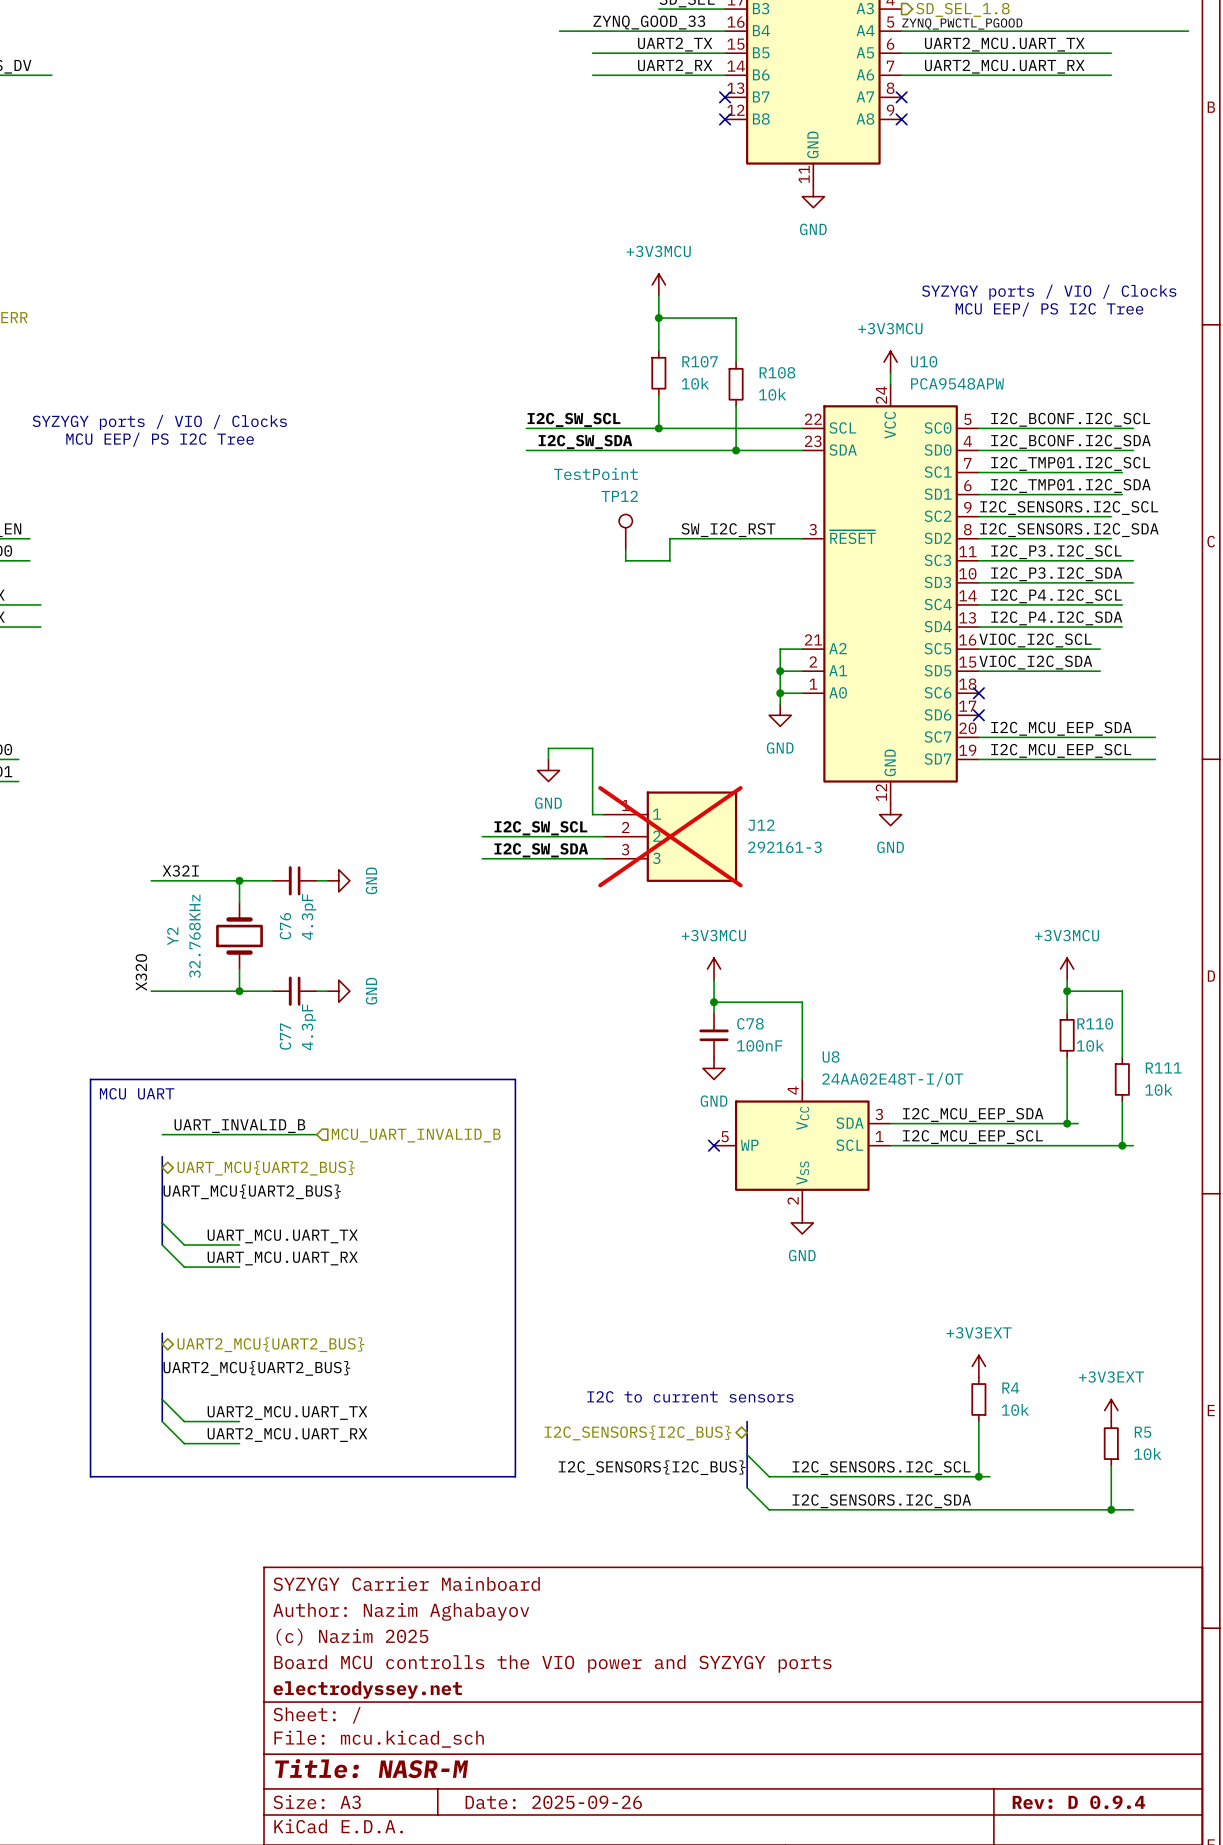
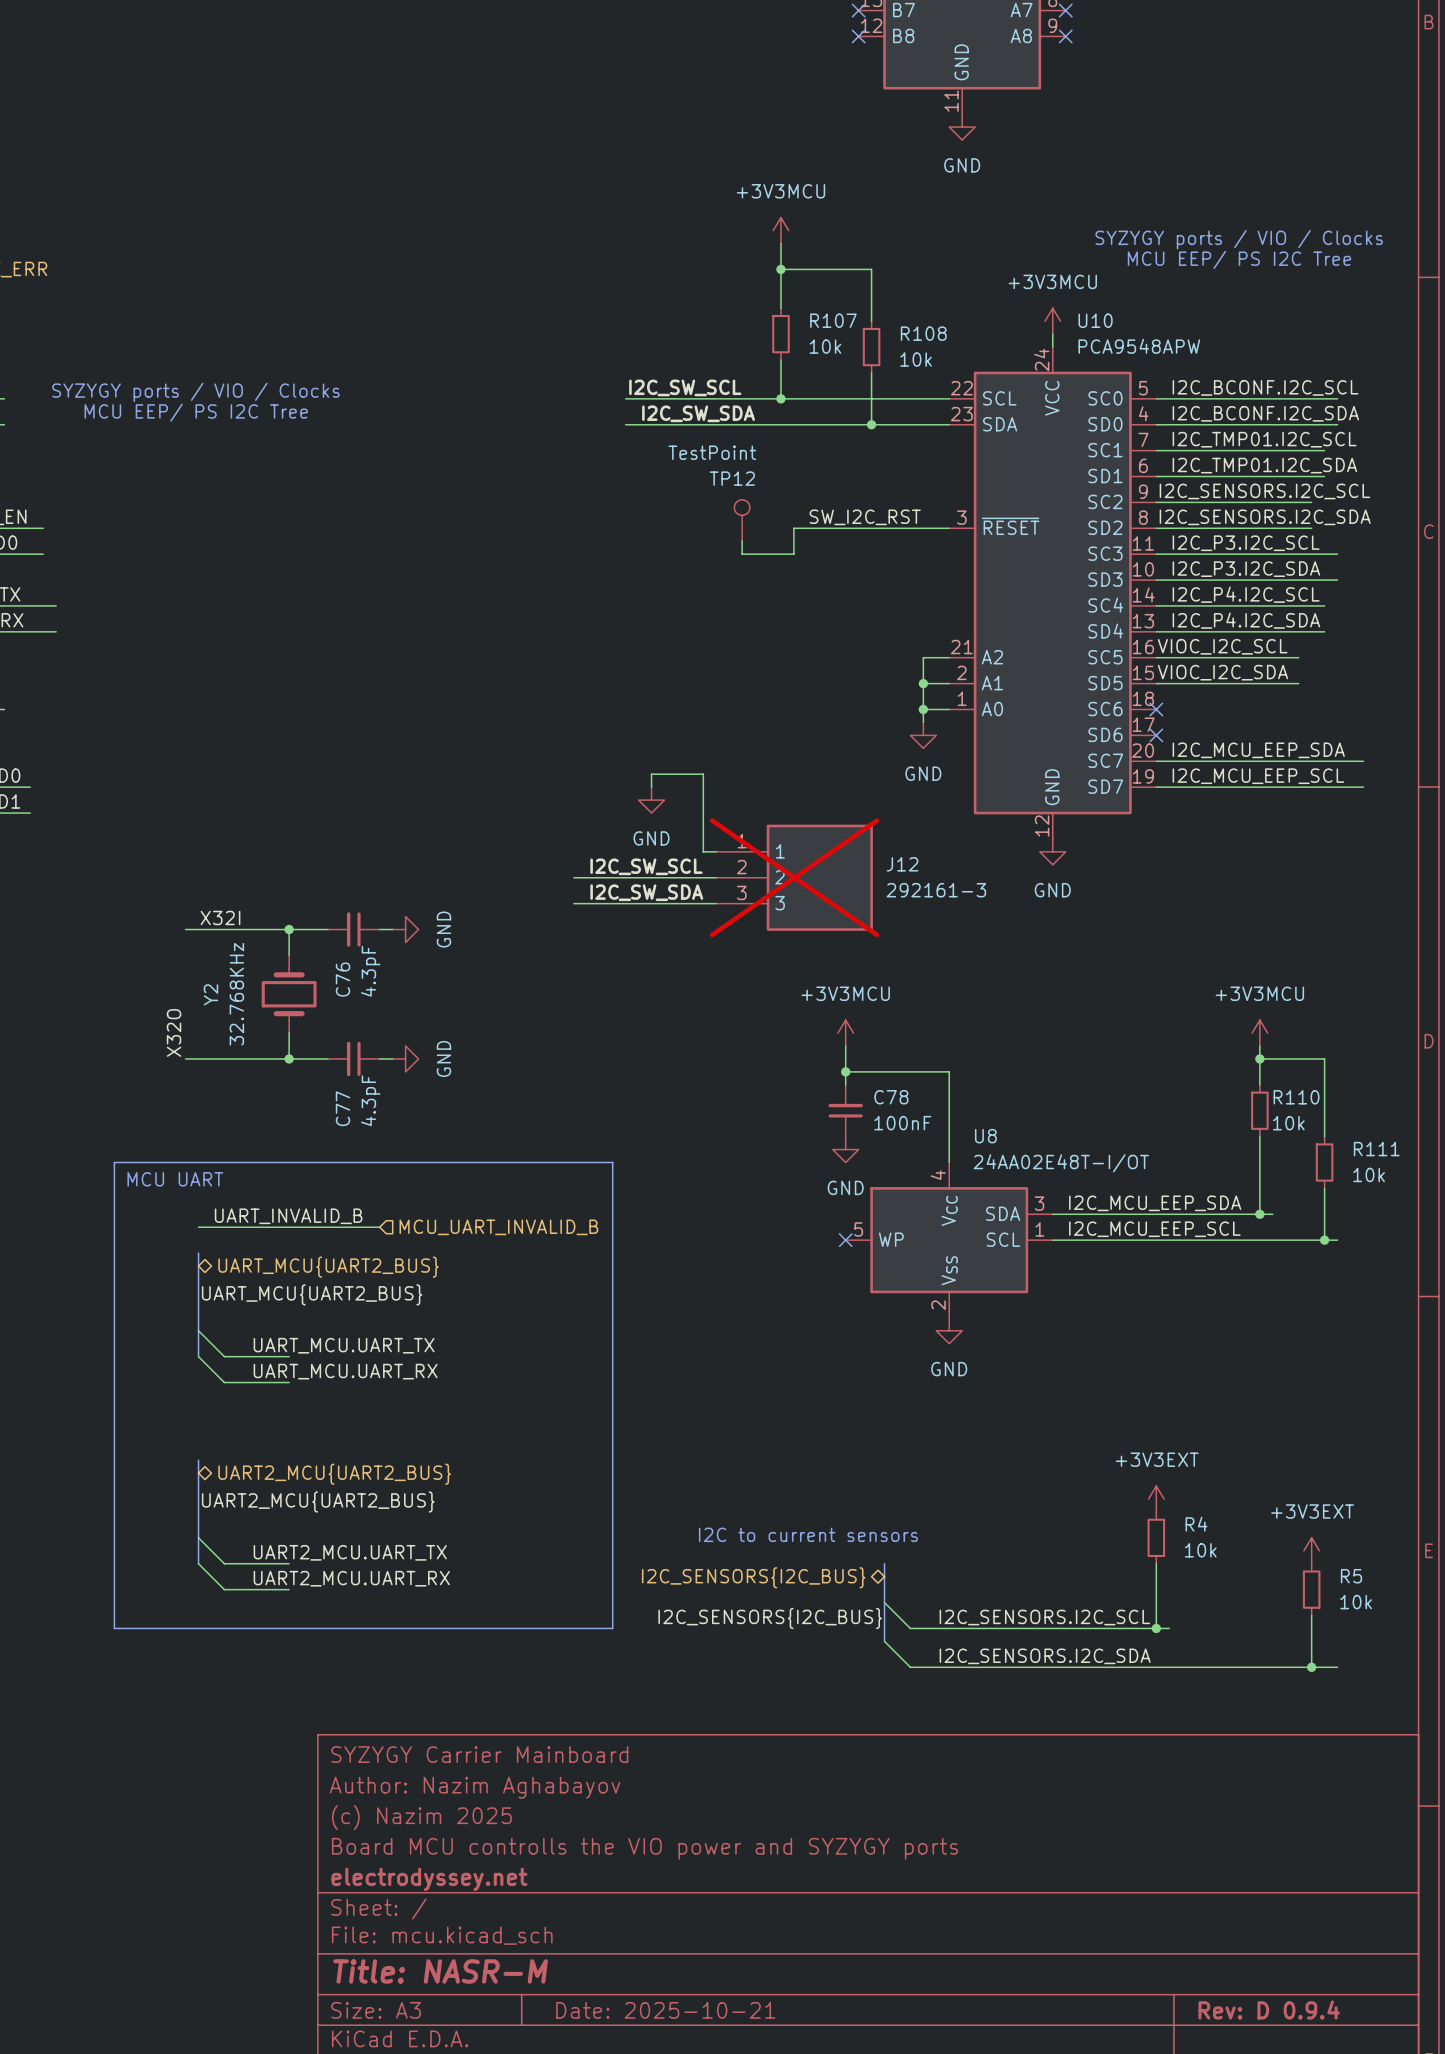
title block: Date: 2025-09-26 (553, 1802) -> Date: 2025-10-21 (665, 2010)

